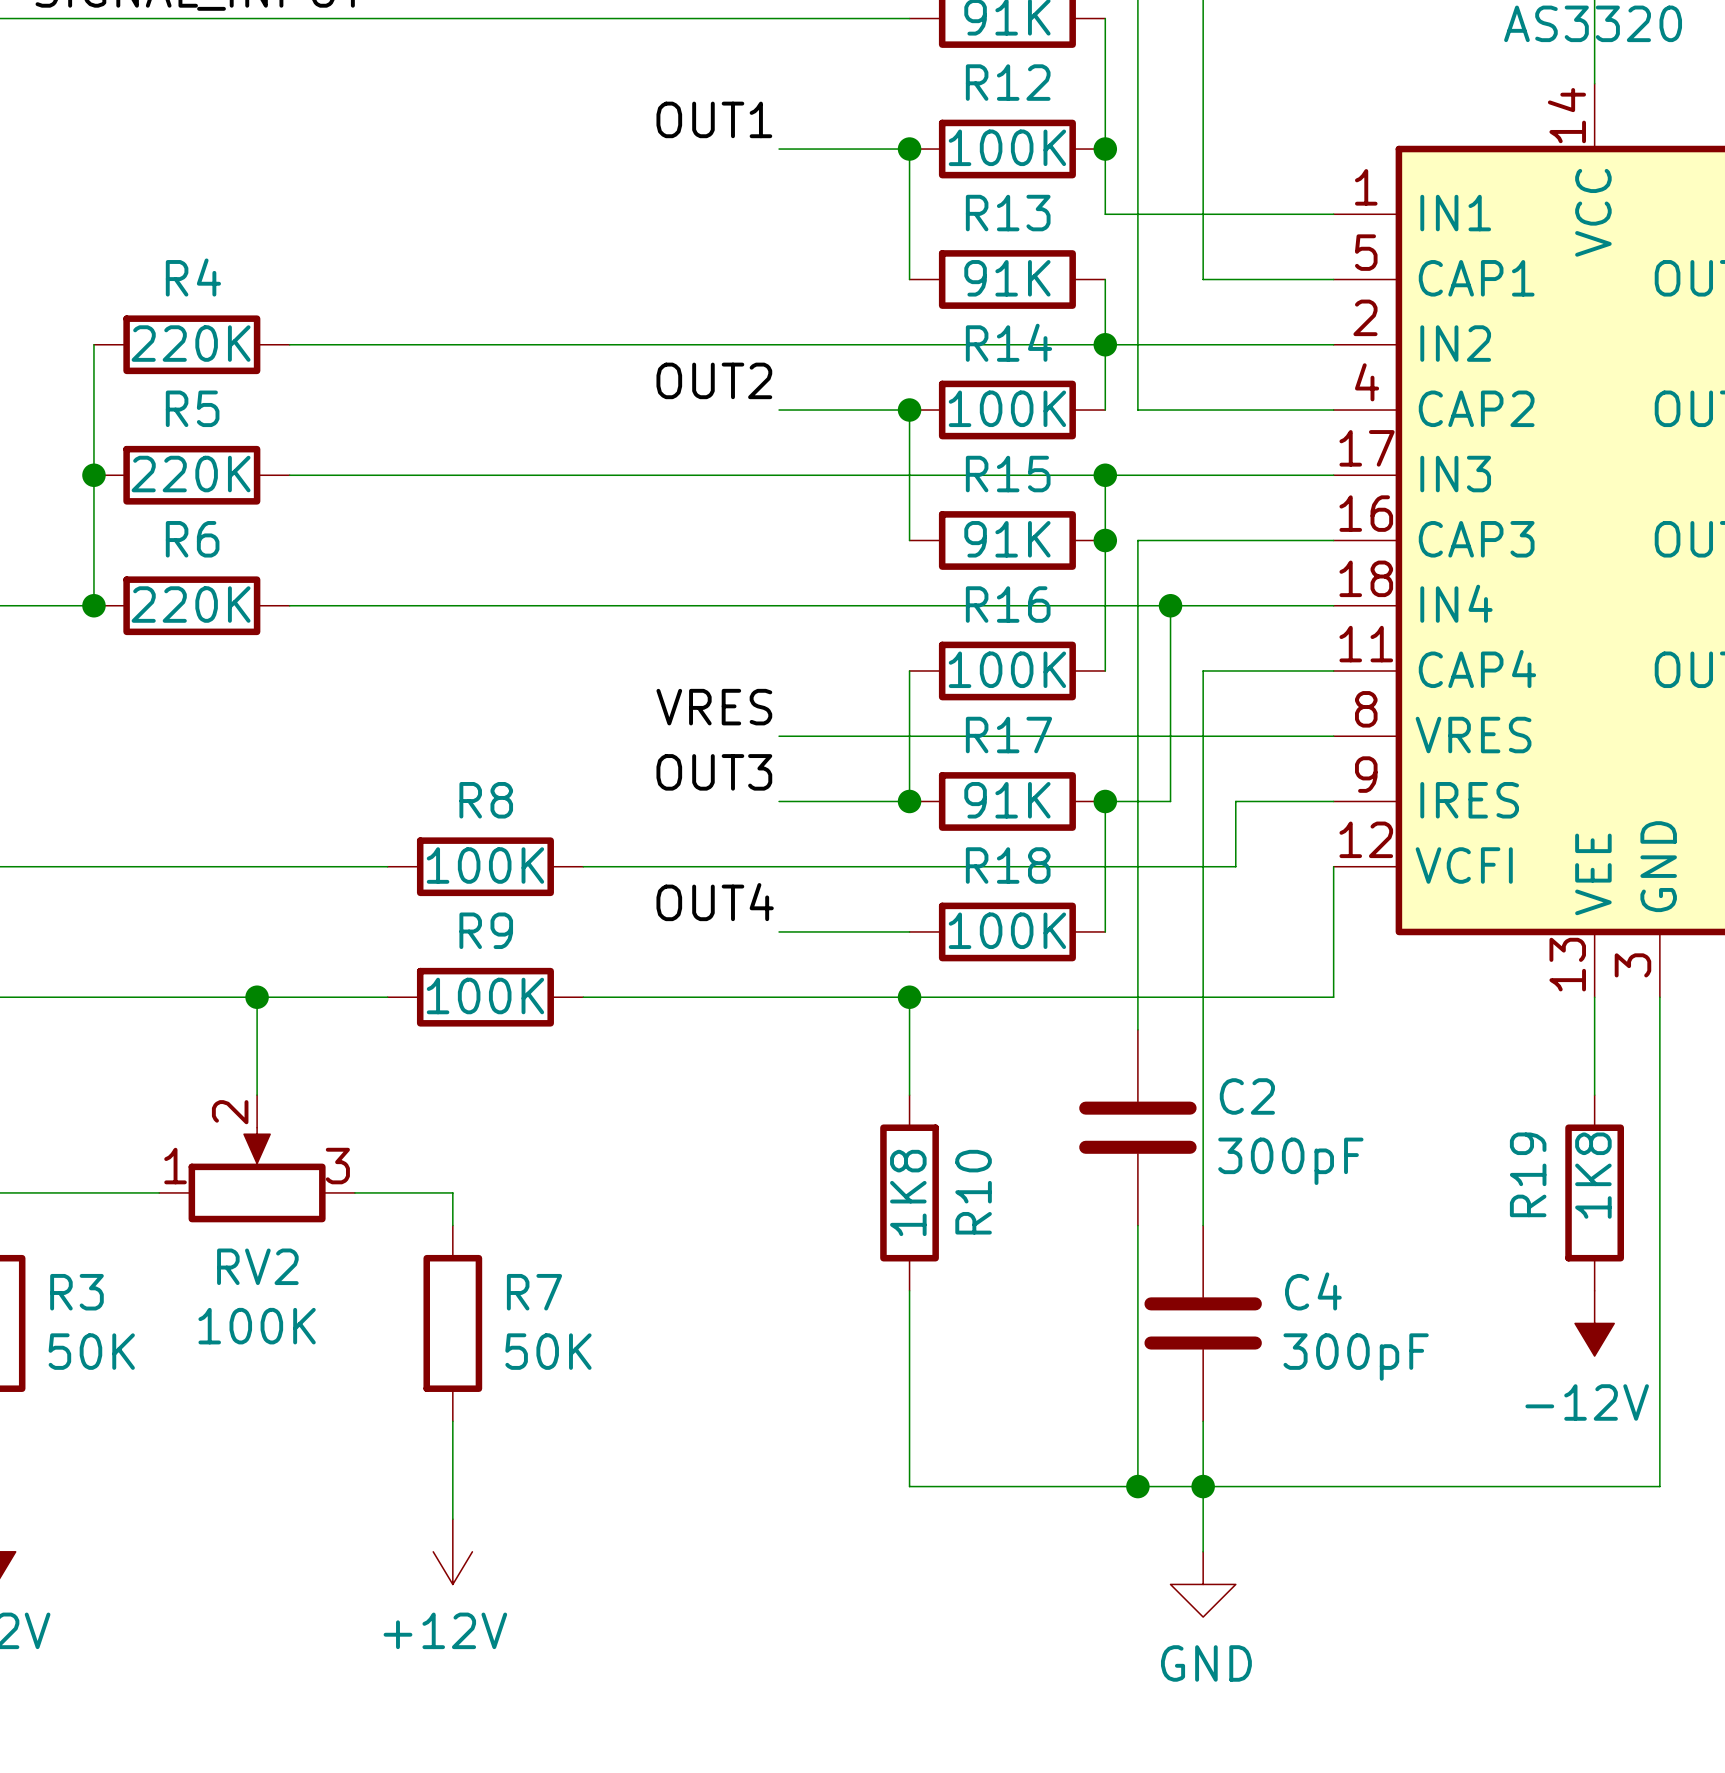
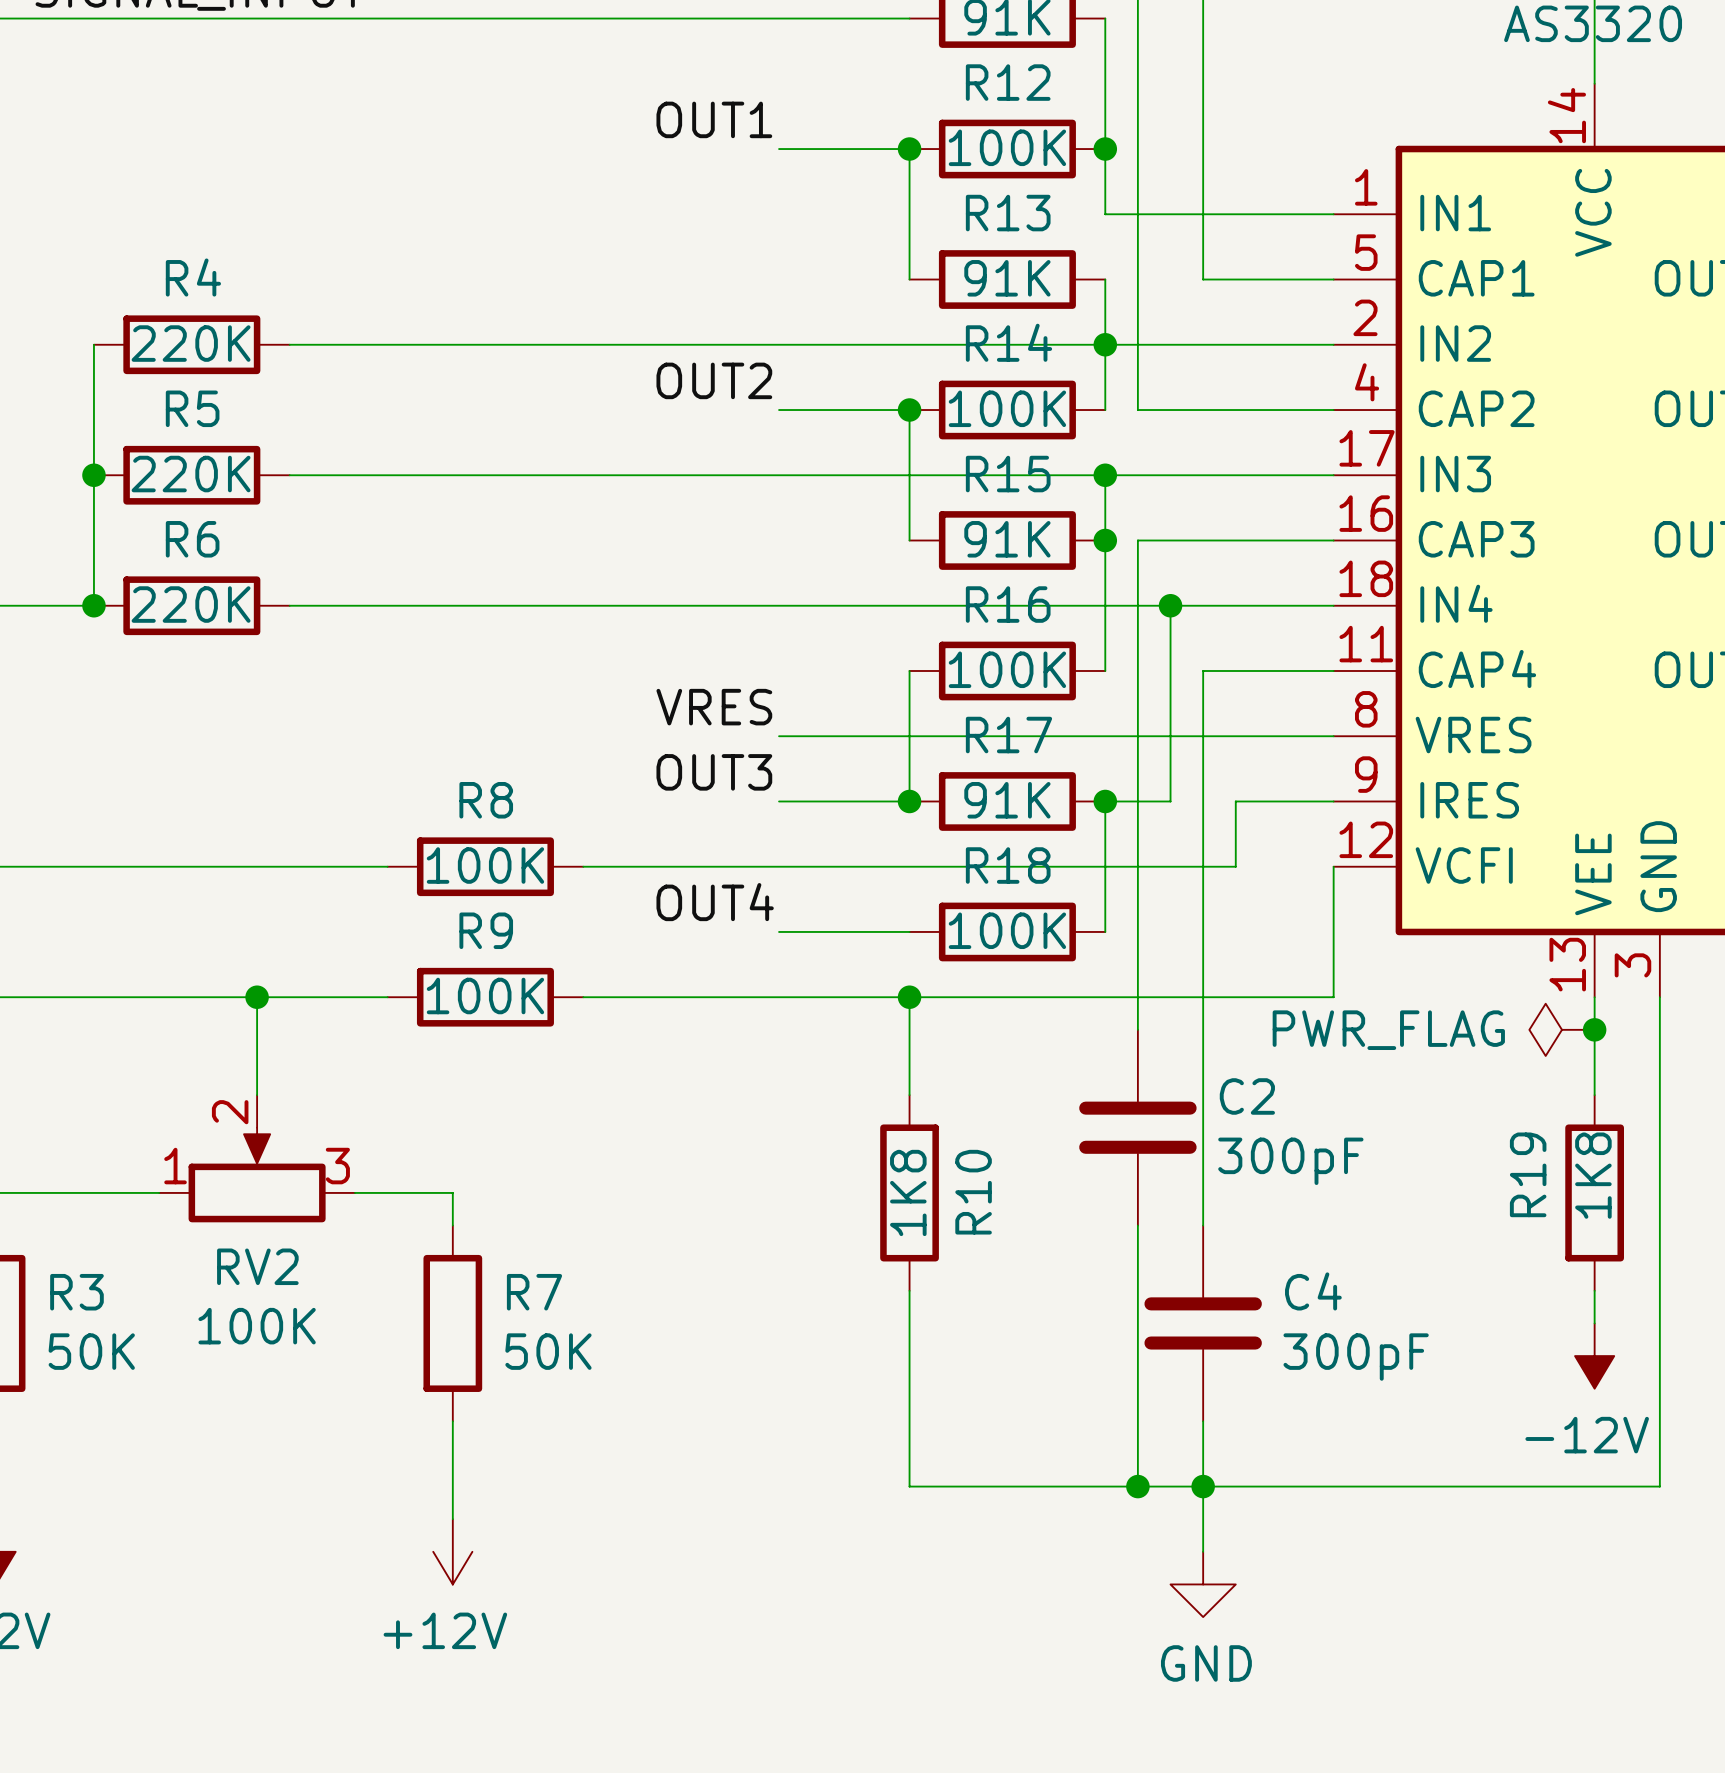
power symbol: none -> PWR_FLAG (1562, 1029)
junction: none -> (1594, 1029)
power symbol position: -12V (1594, 1323) -> -12V (1594, 1356)

